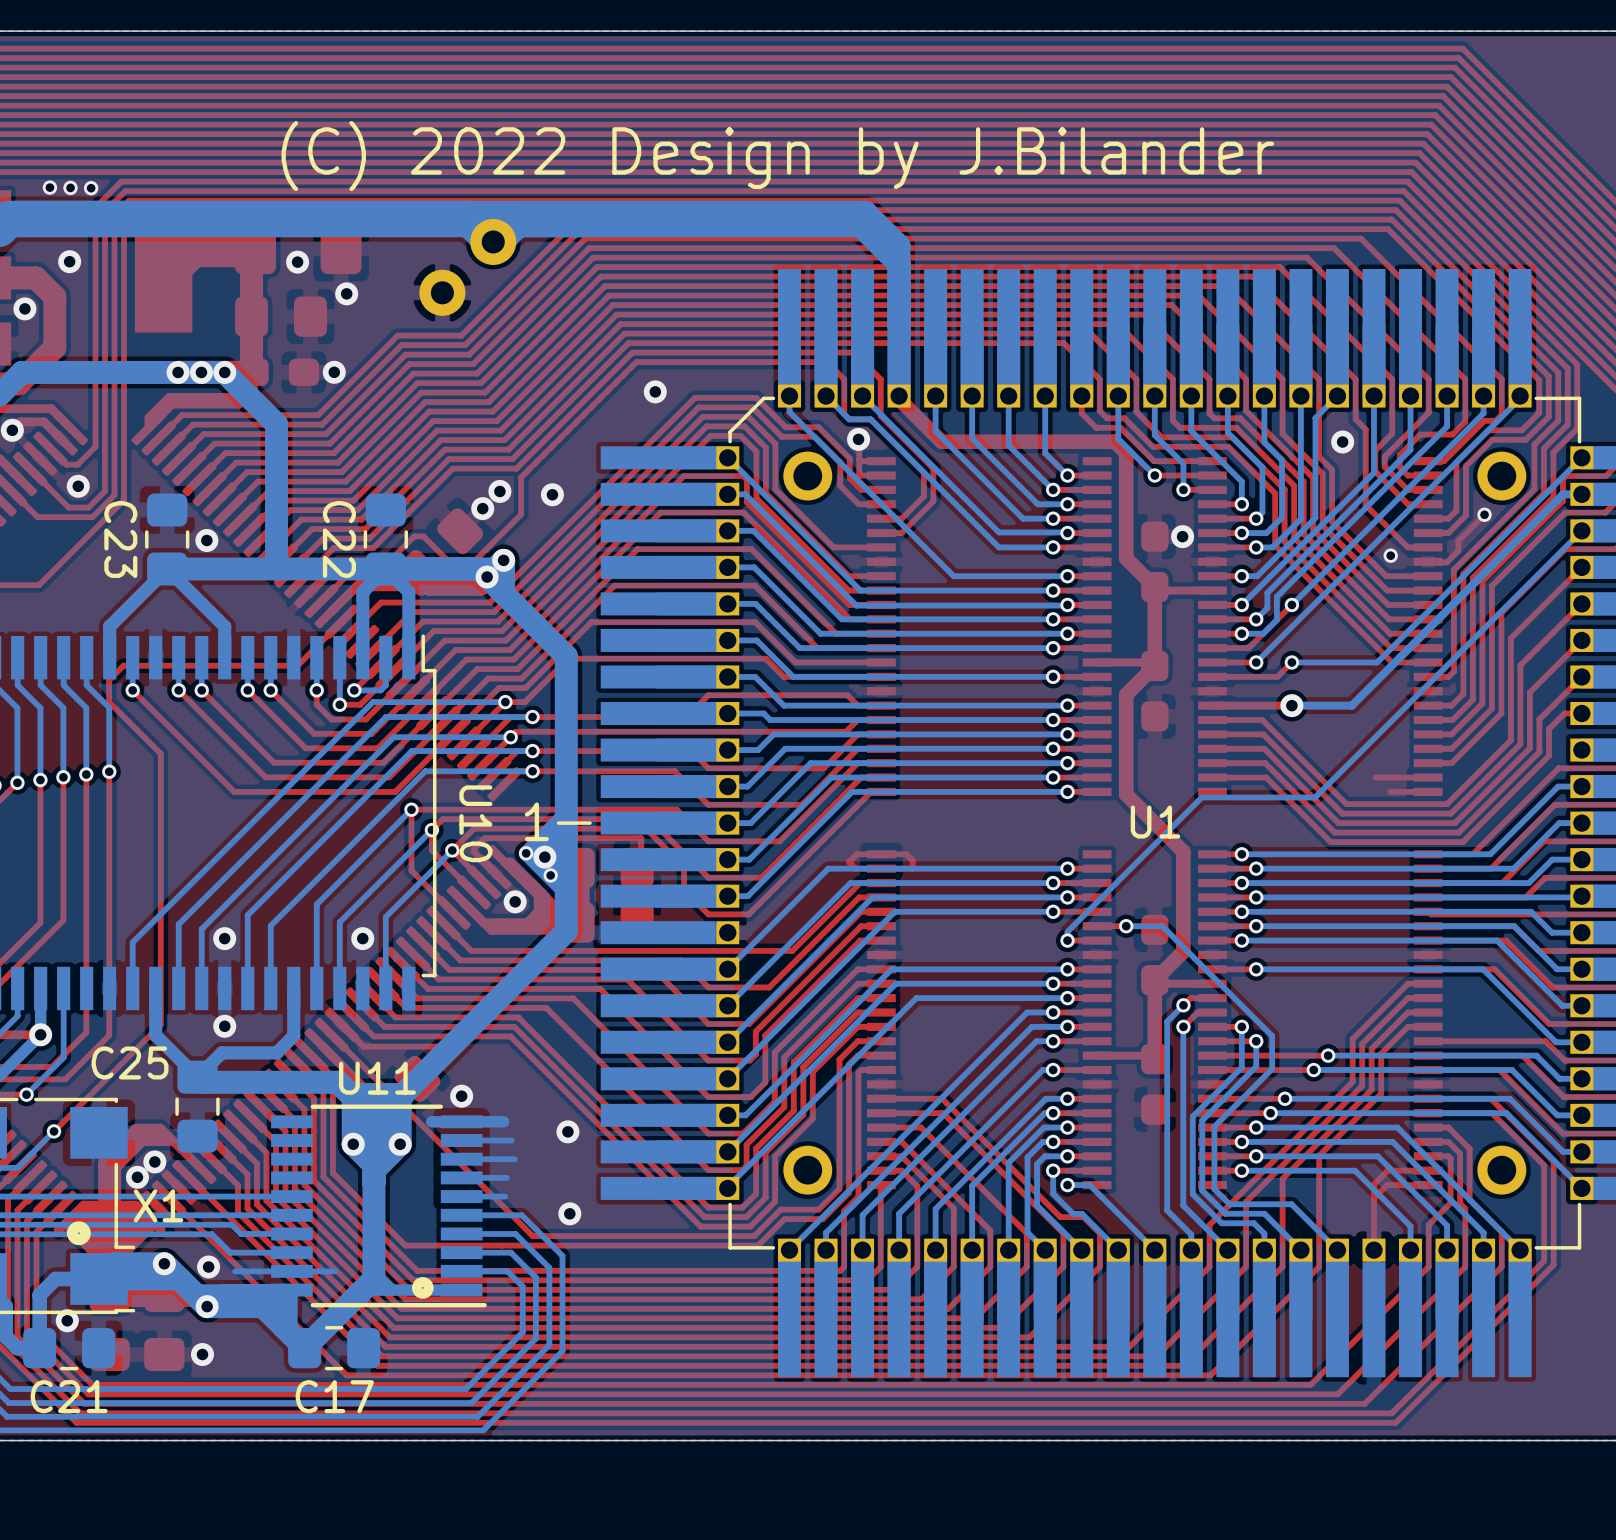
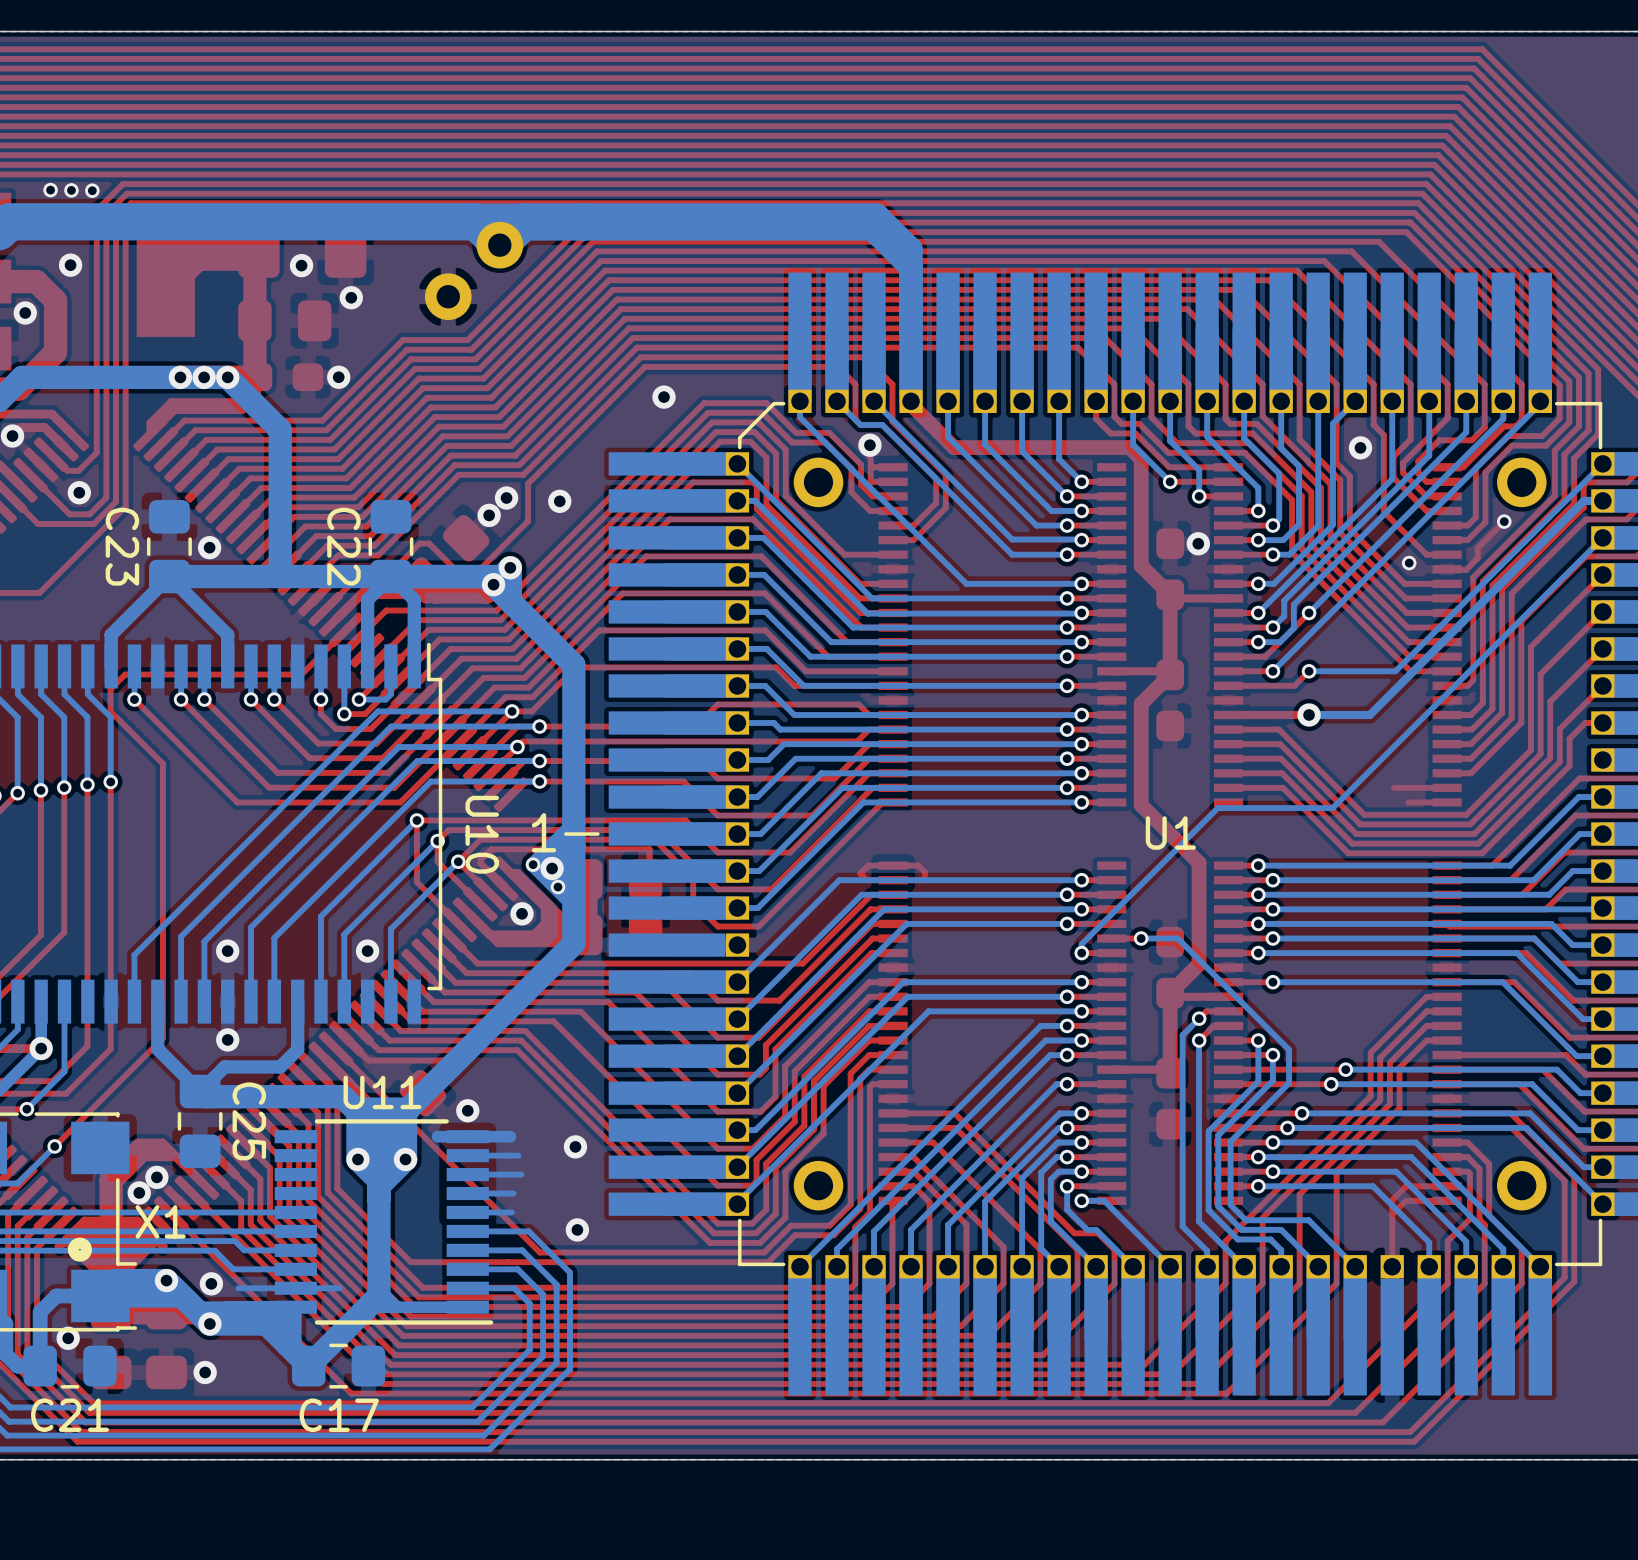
text: (C) 2022 Design by J.Bilander (777, 156) -> none
C25 name rotation: 0° (129, 1062) -> 90° clockwise (249, 1121)
C25 name position: C25 (129, 1062) -> C25 (249, 1121)
U11 footprint: [271, 1104, 487, 1308] -> [274, 1119, 494, 1325]

